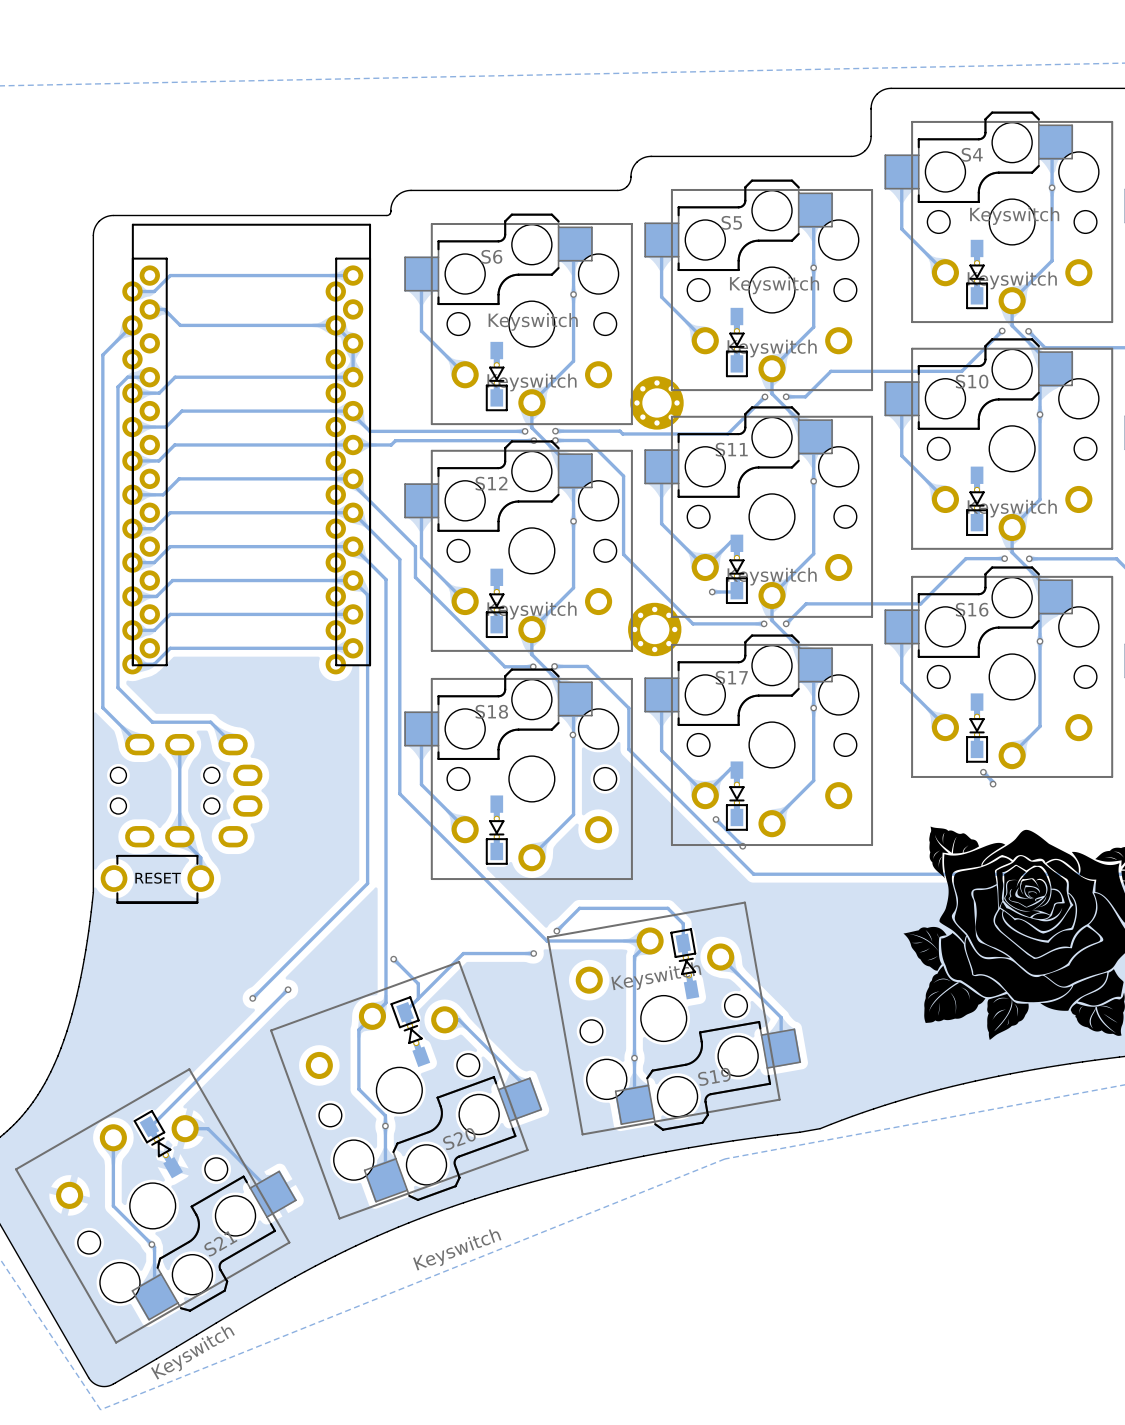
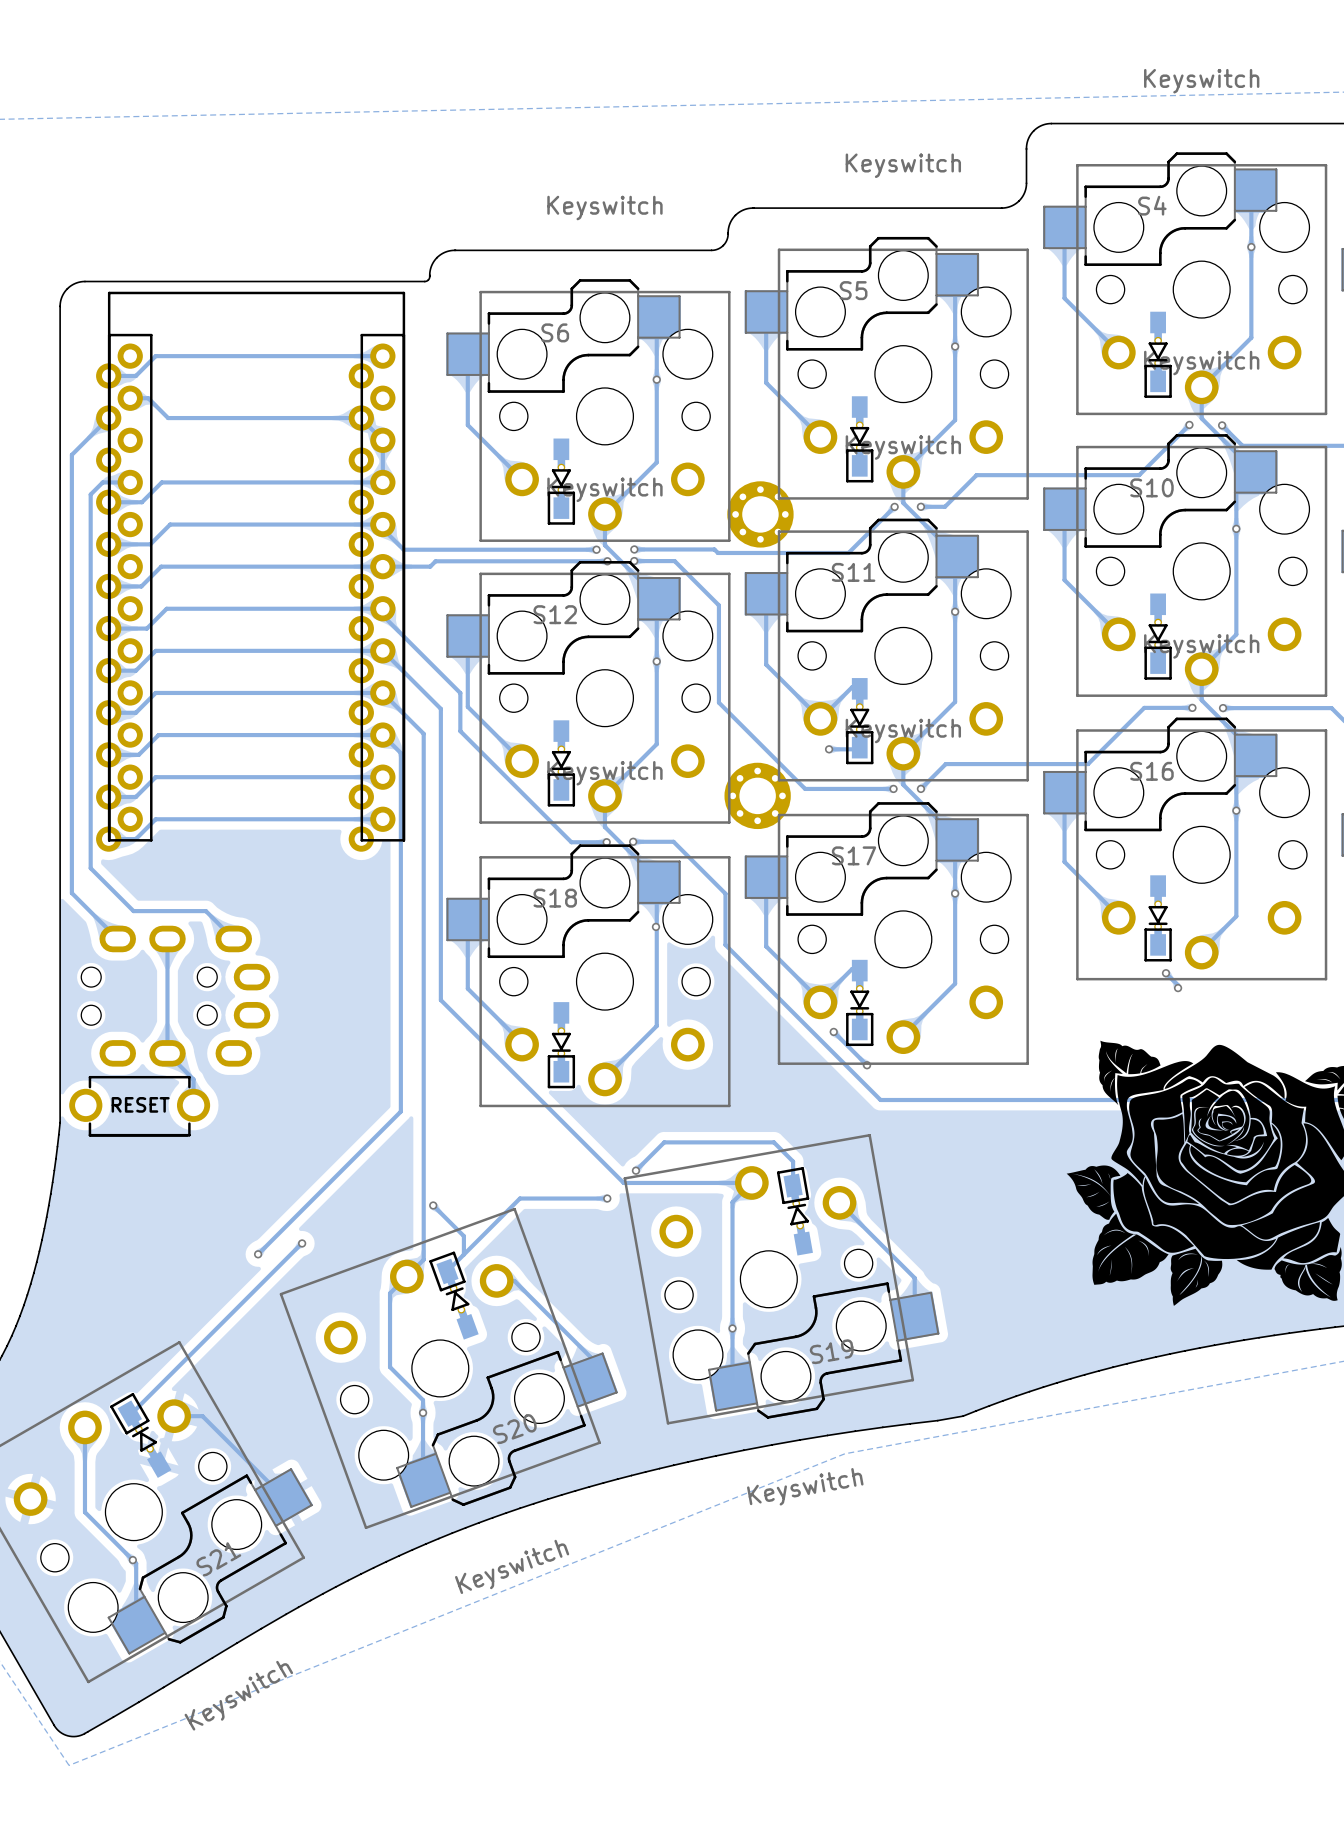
S4 value position: Keyswitch (1014, 216) -> Keyswitch (1201, 81)
S5 value position: Keyswitch (774, 285) -> Keyswitch (903, 165)
S6 value position: Keyswitch (533, 321) -> Keyswitch (604, 208)
S19 value position: Keyswitch (656, 976) -> Keyswitch (805, 1486)
S21 value position: Keyswitch (192, 1352) -> Keyswitch (238, 1695)

